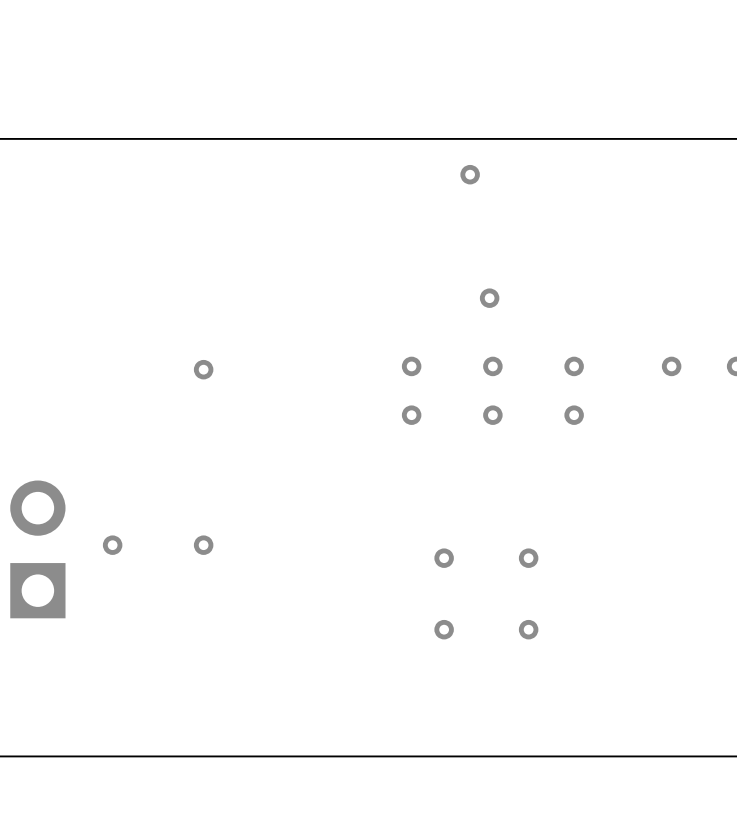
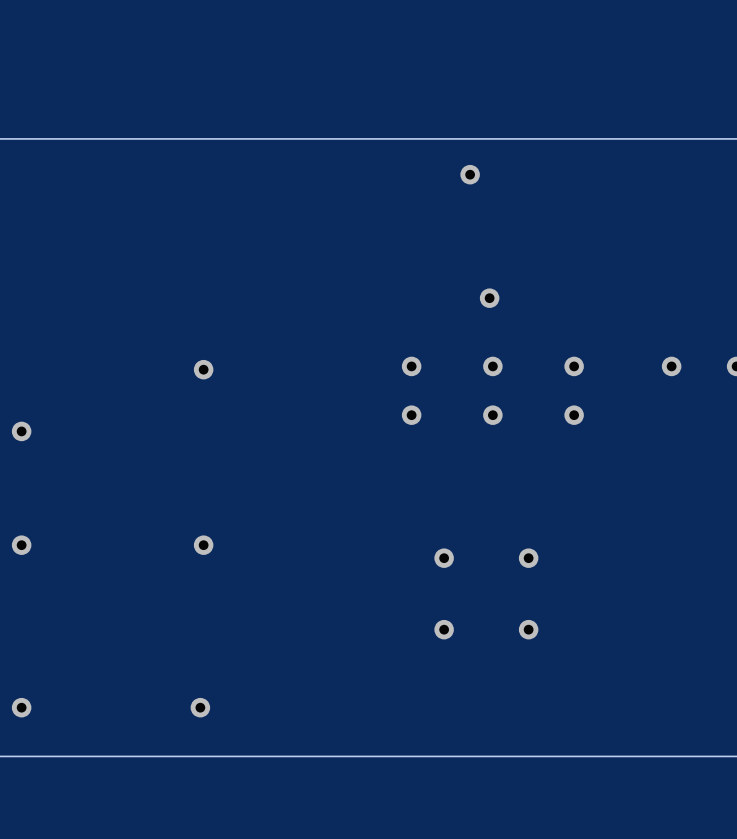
via: none -> (21, 431)
via: none -> (21, 545)
via: (112, 545) -> none
part: (37, 549) -> none
via: none -> (21, 707)
via: none -> (200, 707)

